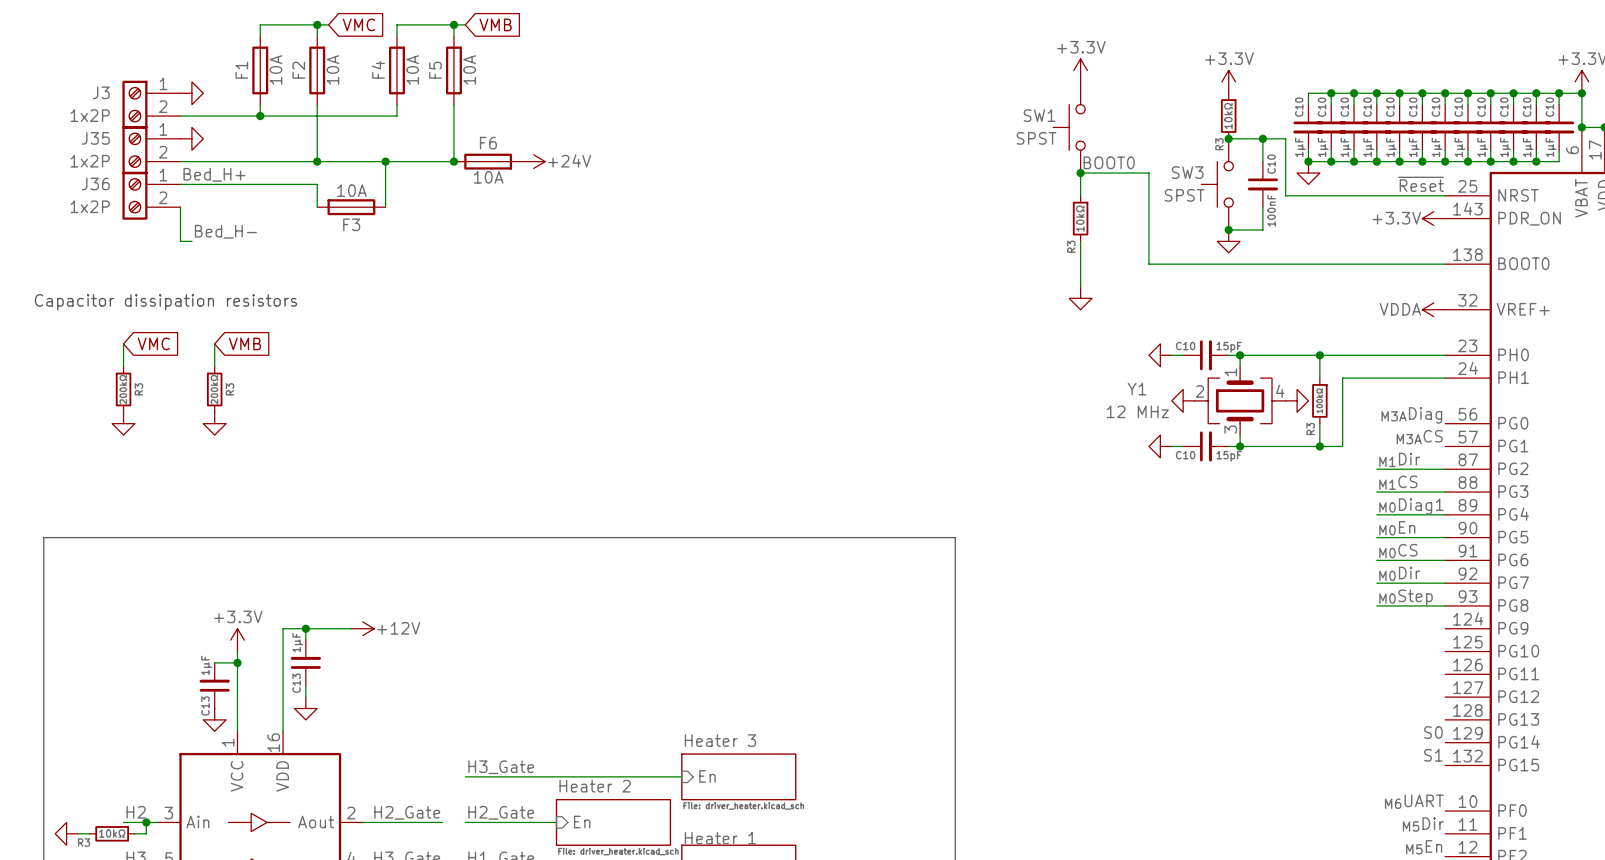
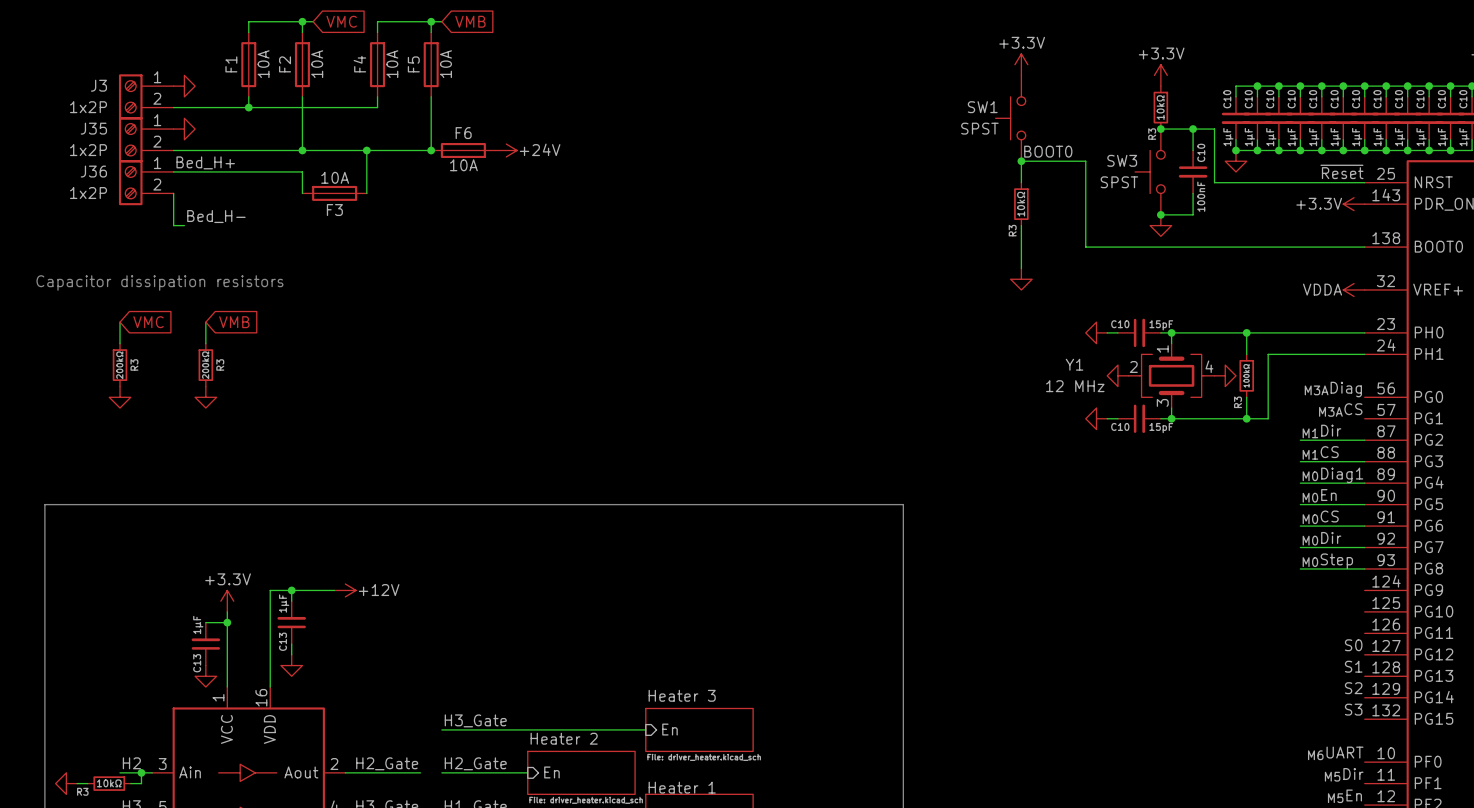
label: none -> S0 (1353, 645)
label: none -> S1 (1353, 666)
label: S0 (1433, 732) -> S2 (1353, 688)
label: S1 (1433, 755) -> S3 (1353, 709)

